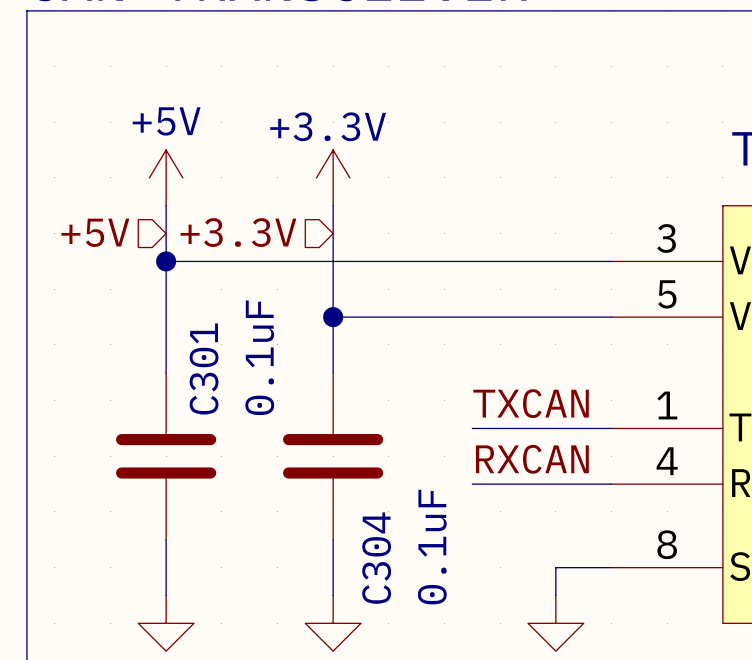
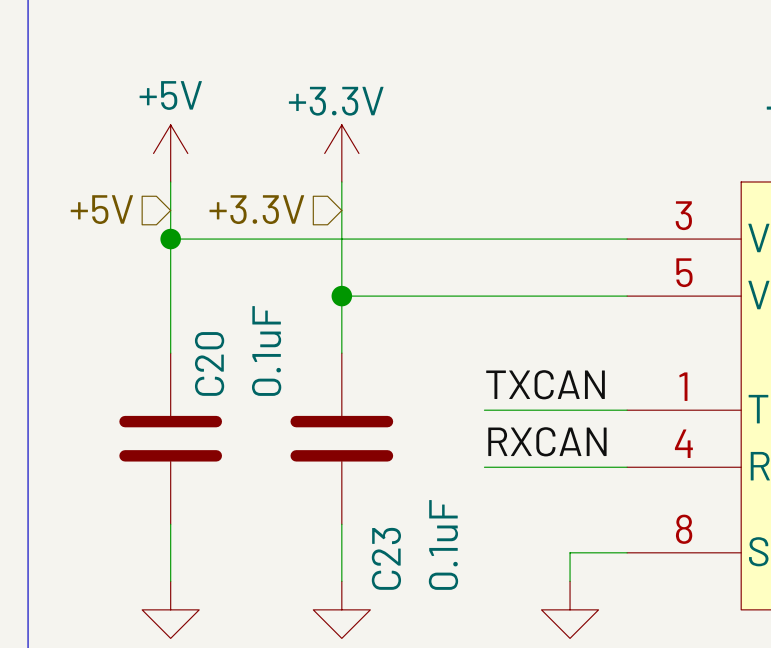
C301 name: C301 (204, 369) -> C20 (209, 363)
C304 name: C304 (376, 558) -> C23 (386, 558)

